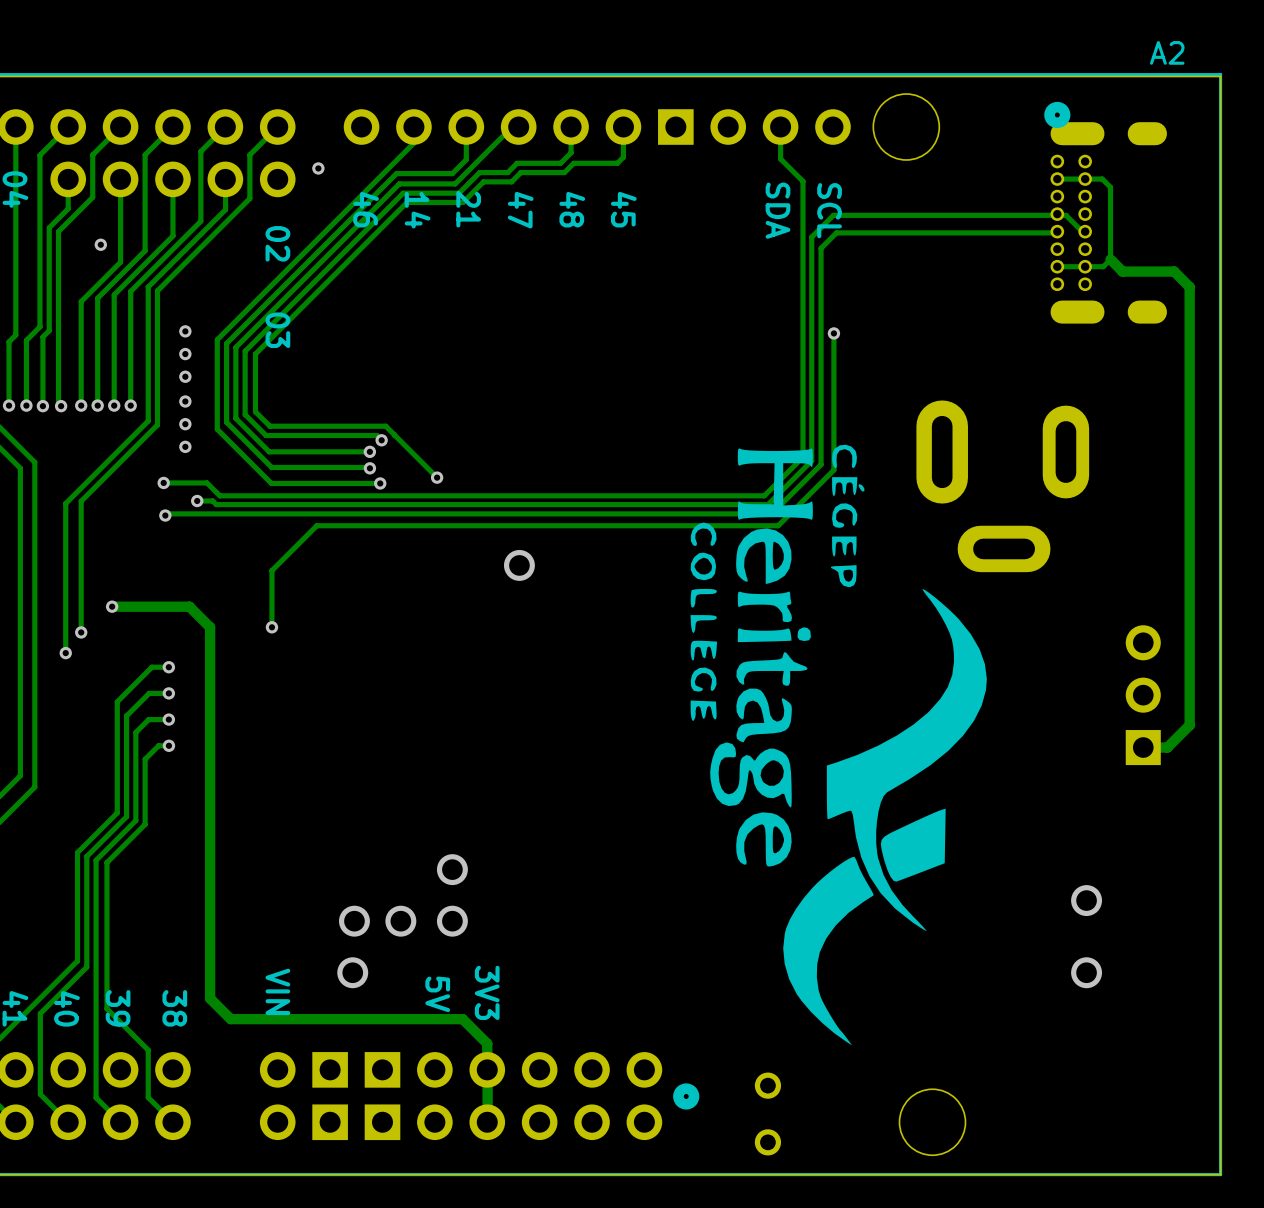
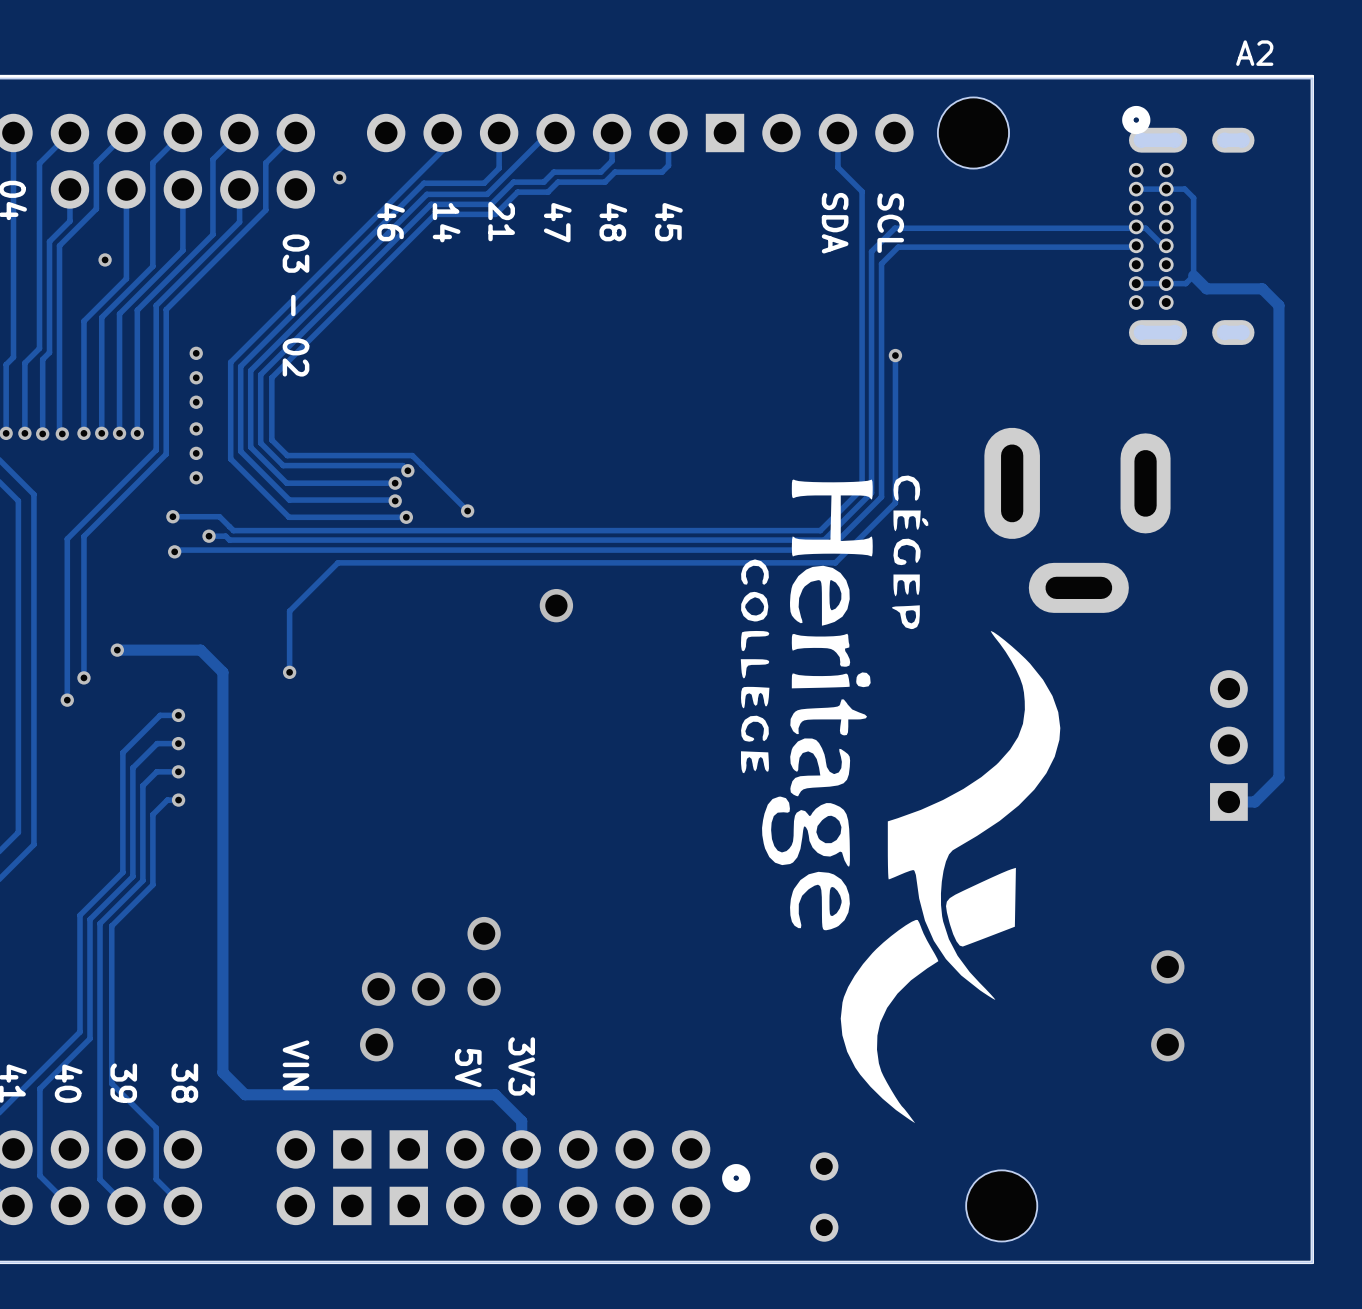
text: 02 03 (277, 287) -> 03 - 02 (296, 305)

